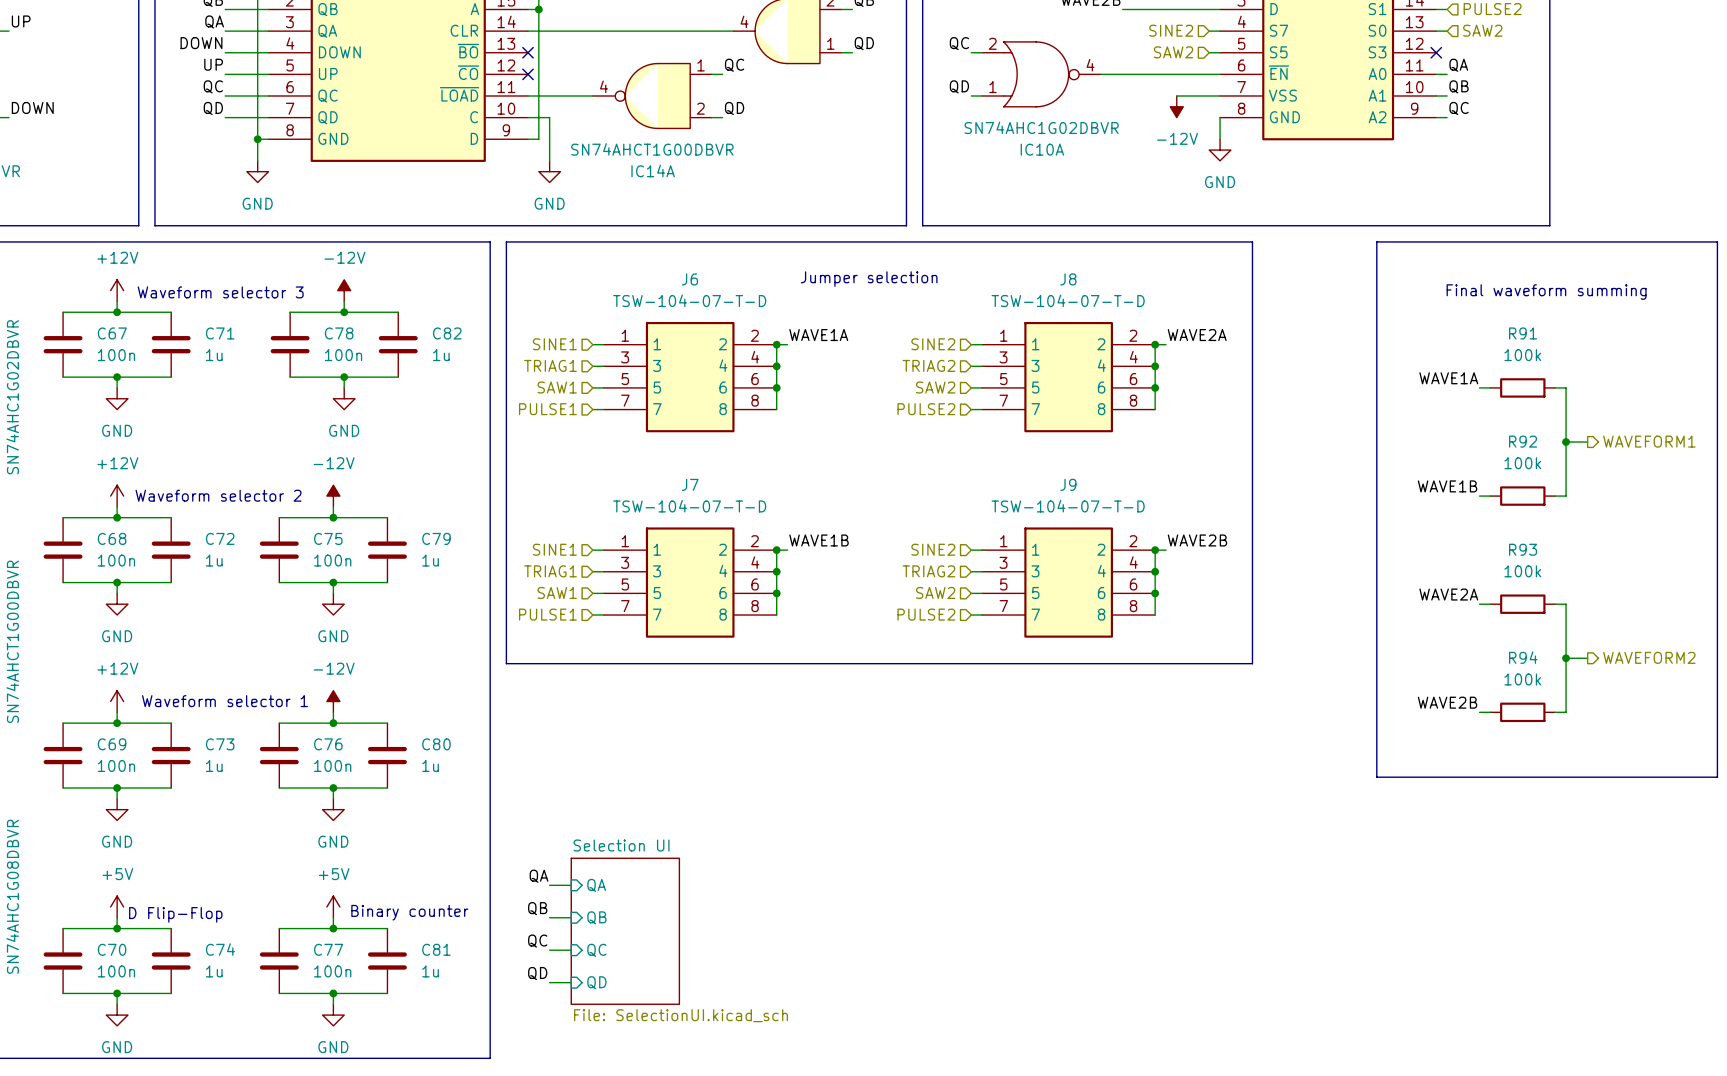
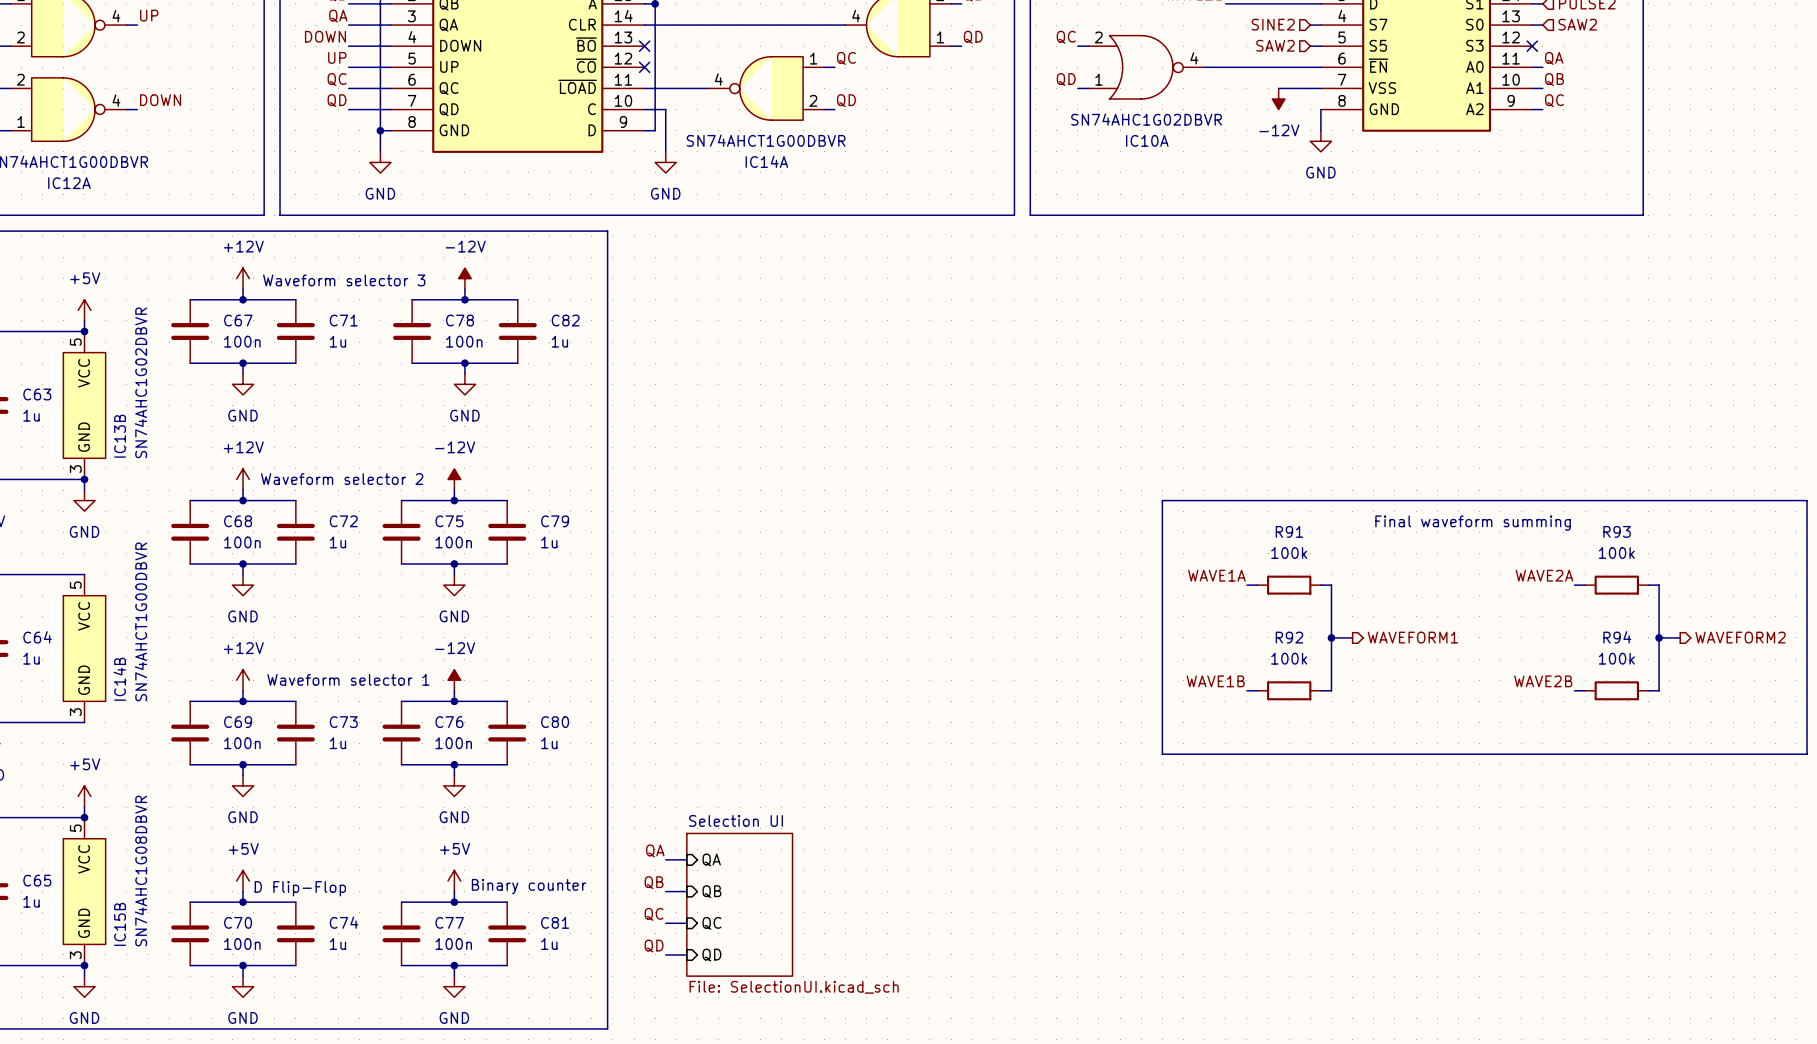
line: (506, 241) (1252, 241) (1252, 663) (506, 663) (506, 241) -> none
text: Jumper selection (869, 279) -> none
text: Final waveform summing (1546, 292) -> none
label: WAVE1A (818, 335) -> none
label: WAVE2A (1197, 335) -> none
hierarchical label: SINE1 (554, 344) -> none
wire: (592, 344) (603, 344) -> none
junction: (776, 344) -> none
wire: (787, 344) (776, 344) (776, 409) -> none
hierarchical label: SINE2 (933, 344) -> none
wire: (971, 344) (982, 344) -> none
junction: (1155, 344) -> none
wire: (1165, 344) (1155, 344) (1155, 409) -> none
hierarchical label: TRIAG1 (550, 365) -> none
hierarchical label: TRIAG2 (928, 365) -> none
wire: (592, 366) (603, 366) -> none
junction: (776, 366) -> none
wire: (971, 366) (982, 366) -> none
junction: (1155, 366) -> none
J6: TSW-104-07-T-D (690, 377) -> none
J8: TSW-104-07-T-D (1068, 377) -> none
label: WAVE1A (1448, 378) -> none
hierarchical label: SAW1 (557, 387) -> none
wire: (592, 387) (603, 387) -> none
junction: (776, 387) -> none
hierarchical label: SAW2 (935, 387) -> none
wire: (971, 387) (982, 387) -> none
junction: (1155, 387) -> none
wire: (1479, 387) (1490, 387) -> none
R91 position: (1522, 387) -> (1289, 585)
wire: (1555, 387) (1566, 387) (1566, 496) (1555, 496) -> none
hierarchical label: PULSE1 (547, 409) -> none
wire: (592, 409) (603, 409) -> none
hierarchical label: PULSE2 (926, 409) -> none
wire: (971, 409) (982, 409) -> none
hierarchical label: WAVEFORM1 (1649, 441) -> none
wire: (1566, 442) (1587, 442) -> none
junction: (1566, 442) -> none
label: WAVE1B (1447, 486) -> none
wire: (1479, 496) (1490, 496) -> none
R92 position: (1522, 496) -> (1289, 690)
line: (1717, 517) (1717, 241) (1376, 241) (1376, 777) -> (1807, 500) (1162, 500) (1162, 754) (1474, 754)
label: WAVE1B (819, 540) -> none
label: WAVE2B (1197, 540) -> none
text: none -> Final waveform summing (1473, 523)
hierarchical label: SINE1 (554, 549) -> none
hierarchical label: SINE2 (933, 549) -> none
wire: (592, 550) (603, 550) -> none
junction: (776, 550) -> none
wire: (787, 550) (776, 550) (776, 615) -> none
wire: (971, 550) (982, 550) -> none
junction: (1155, 550) -> none
wire: (1165, 550) (1155, 550) (1155, 615) -> none
hierarchical label: TRIAG1 (550, 571) -> none
wire: (592, 571) (603, 571) -> none
junction: (776, 571) -> none
hierarchical label: TRIAG2 (928, 571) -> none
wire: (971, 571) (982, 571) -> none
junction: (1155, 571) -> none
J7: TSW-104-07-T-D (690, 582) -> none
J9: TSW-104-07-T-D (1068, 582) -> none
hierarchical label: SAW1 (557, 592) -> none
hierarchical label: SAW2 (935, 592) -> none
wire: (592, 593) (603, 593) -> none
junction: (776, 593) -> none
wire: (971, 593) (982, 593) -> (1246, 585) (1257, 585)
junction: (1155, 593) -> none
label: none -> WAVE1A (1216, 575)
wire: none -> (1320, 585) (1331, 585) (1331, 690) (1320, 690)
hierarchical label: PULSE1 (547, 614) -> none
hierarchical label: PULSE2 (926, 614) -> none
wire: (592, 615) (603, 615) -> none
wire: (971, 615) (982, 615) -> (1246, 690) (1257, 690)
hierarchical label: none -> WAVEFORM1 (1412, 637)
wire: none -> (1331, 637) (1352, 637)
junction: none -> (1331, 637)
label: none -> WAVE1B (1215, 681)

